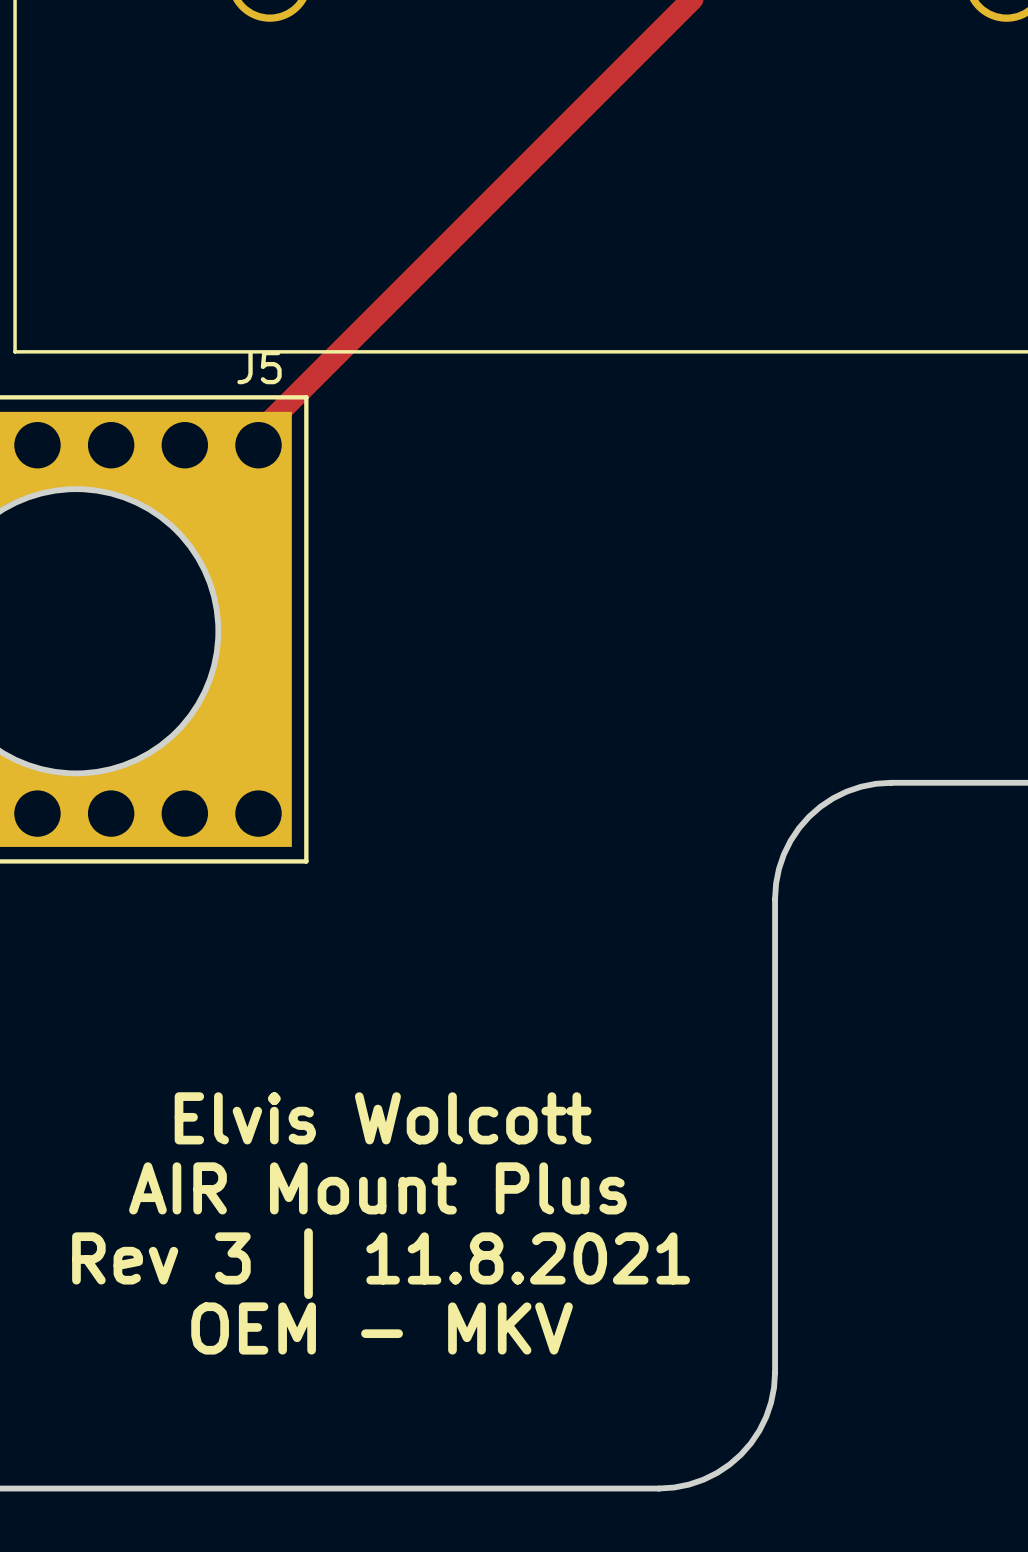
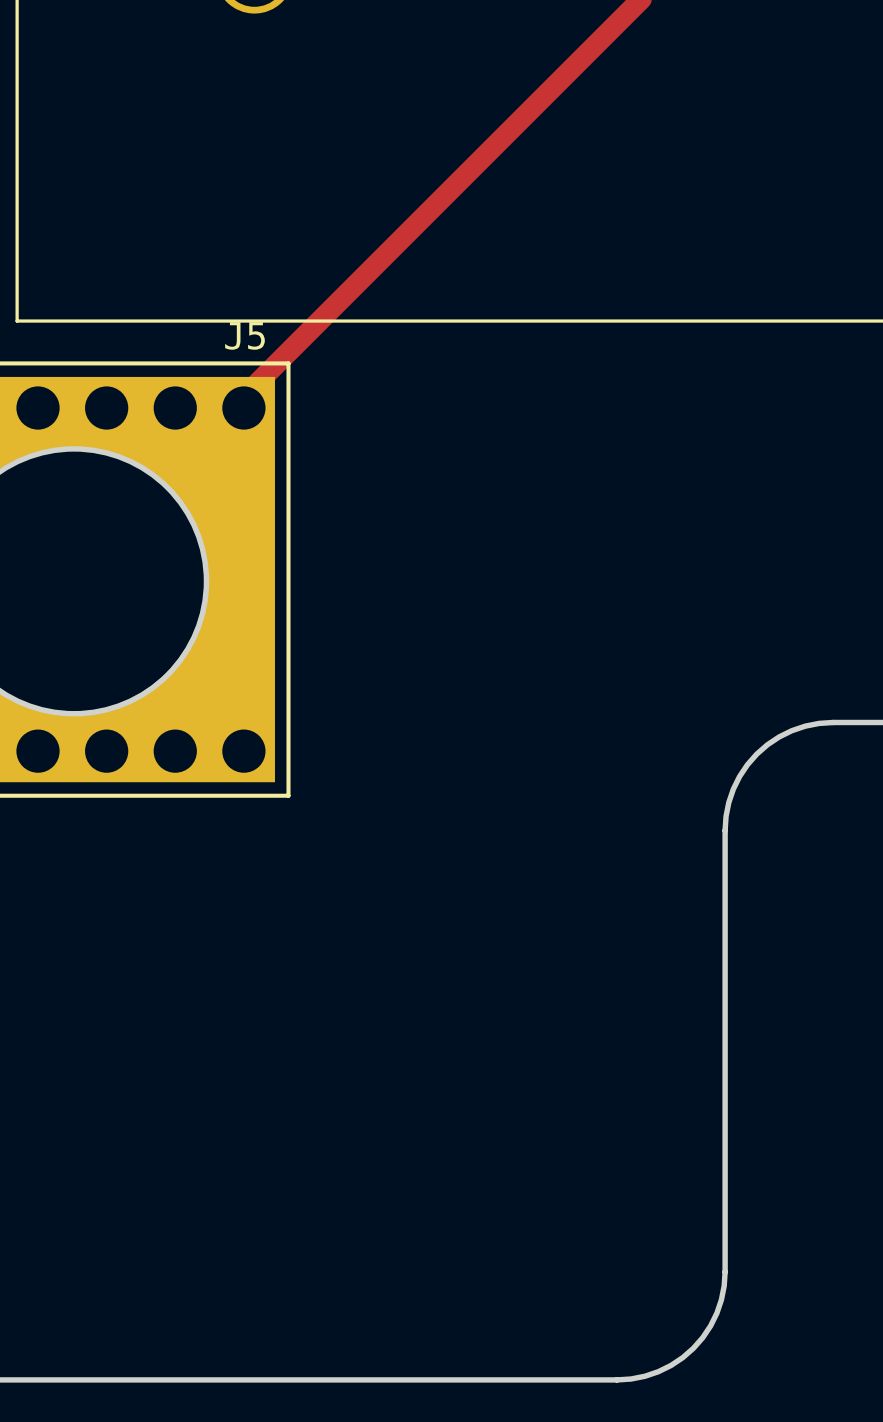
text: Elvis Wolcott (383, 1118) -> none
text: AIR Mount Plus (377, 1188) -> none
text: Rev 3 | 11.8.2021 (381, 1263) -> none
text: OEM - MKV (382, 1328) -> none

